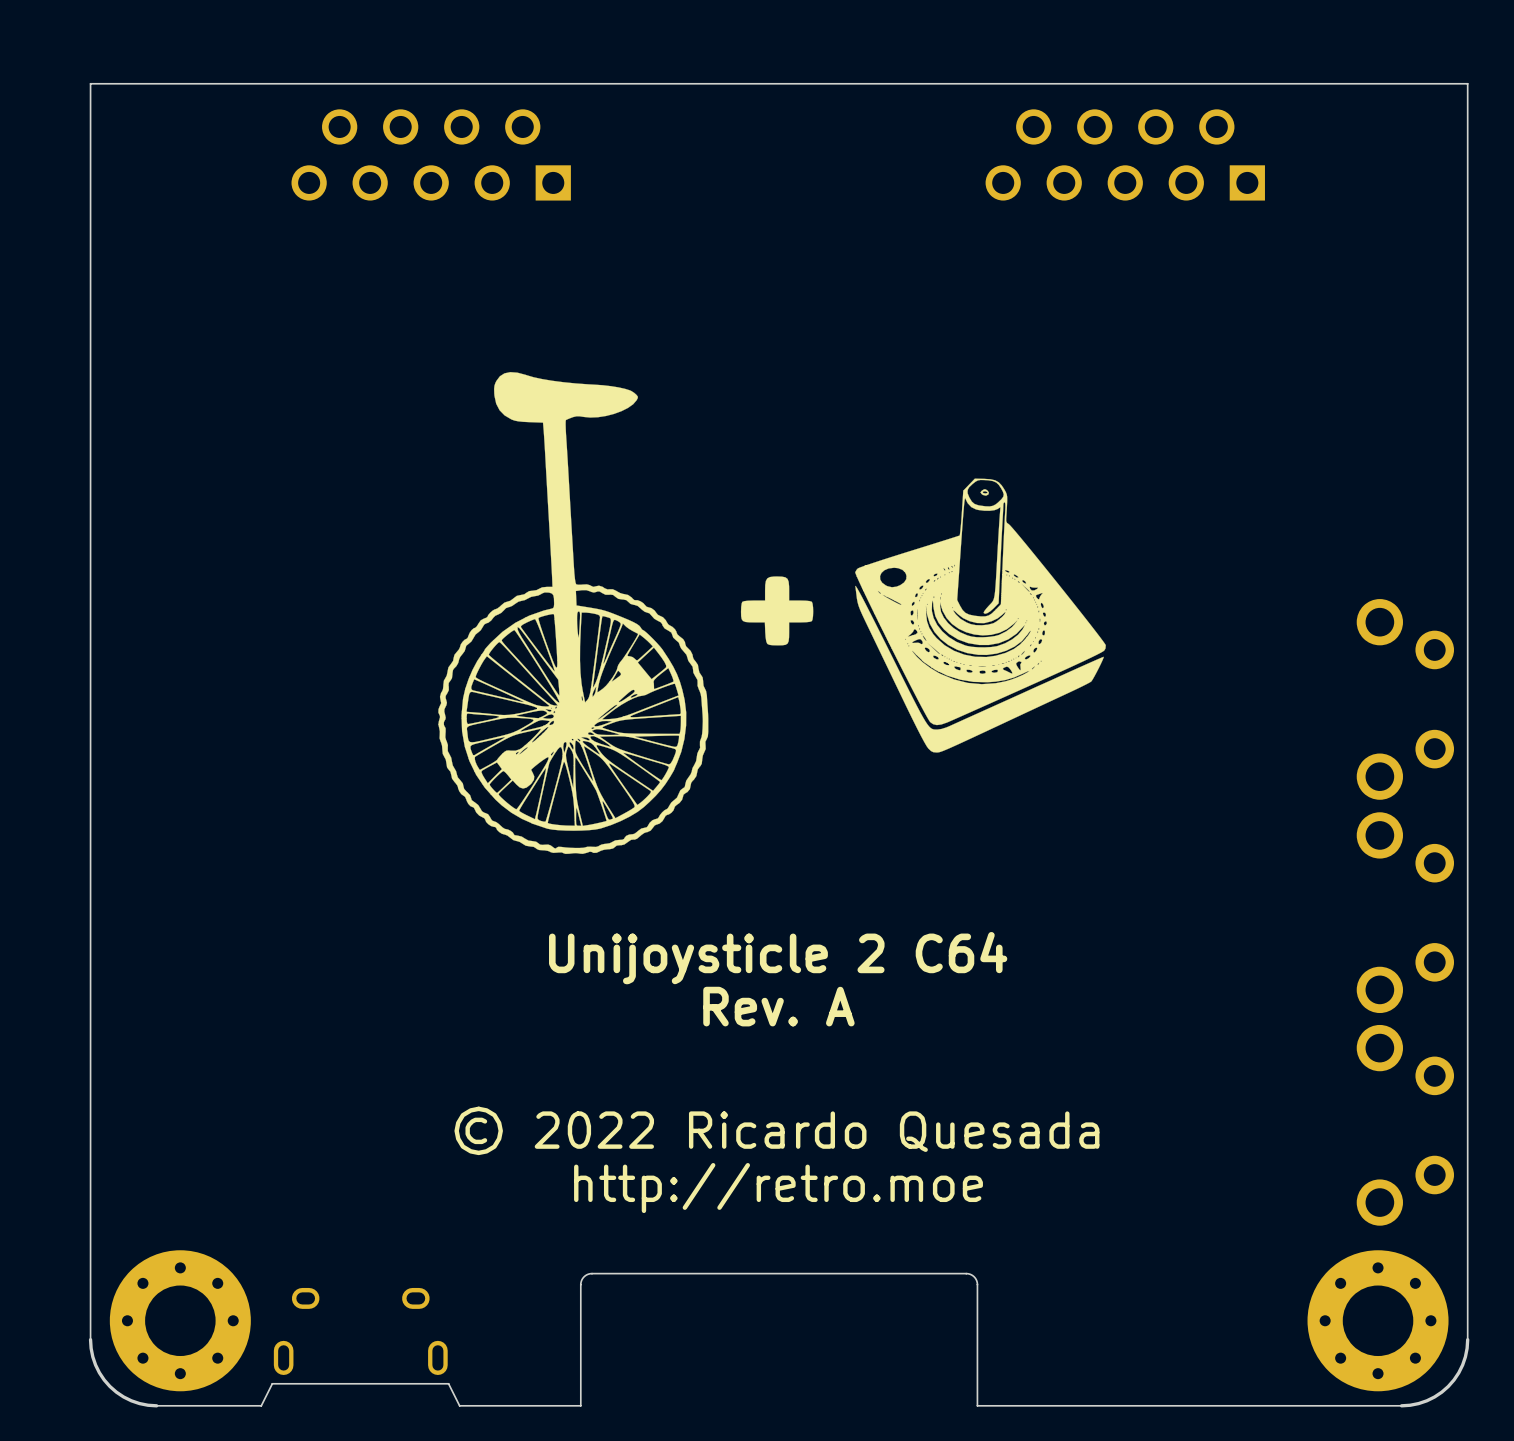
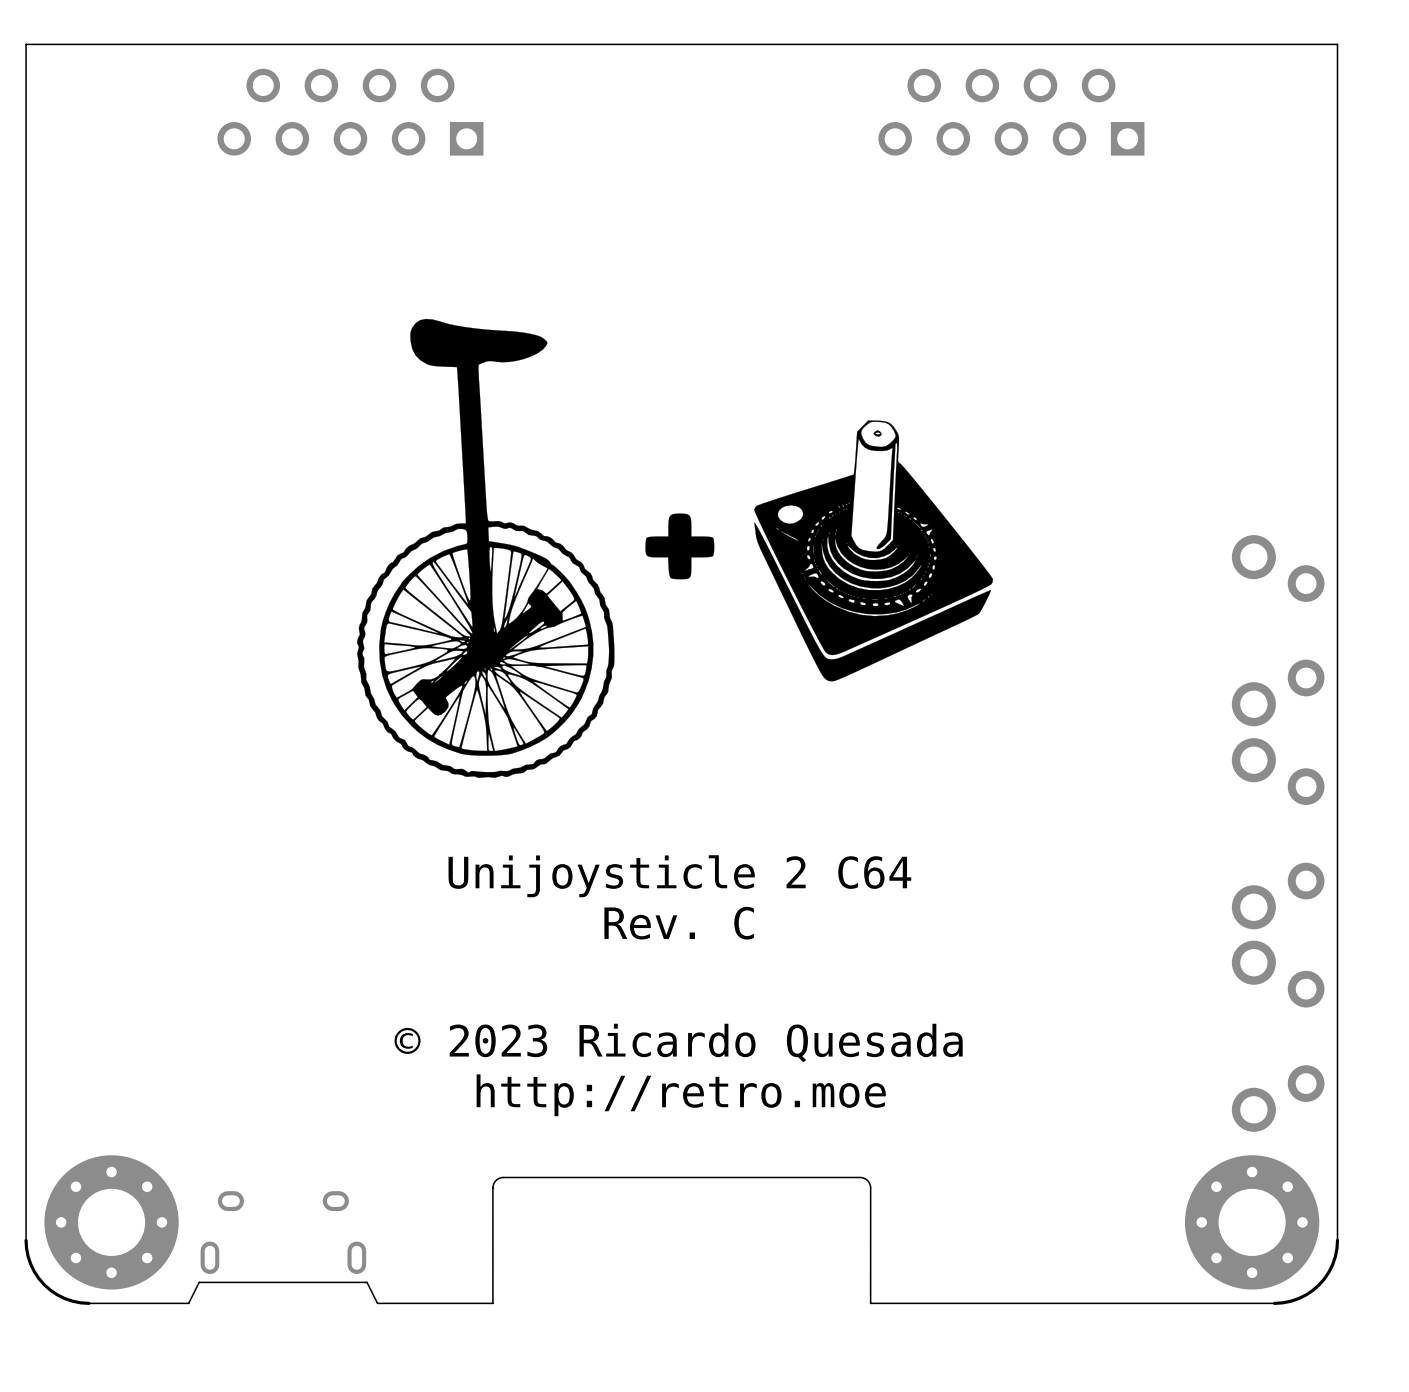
text: Rev. A (778, 1006) -> Rev. C (679, 923)
text: ©️ 2022 Ricardo Quesada (776, 1130) -> ©️ 2023 Ricardo Quesada (678, 1042)

